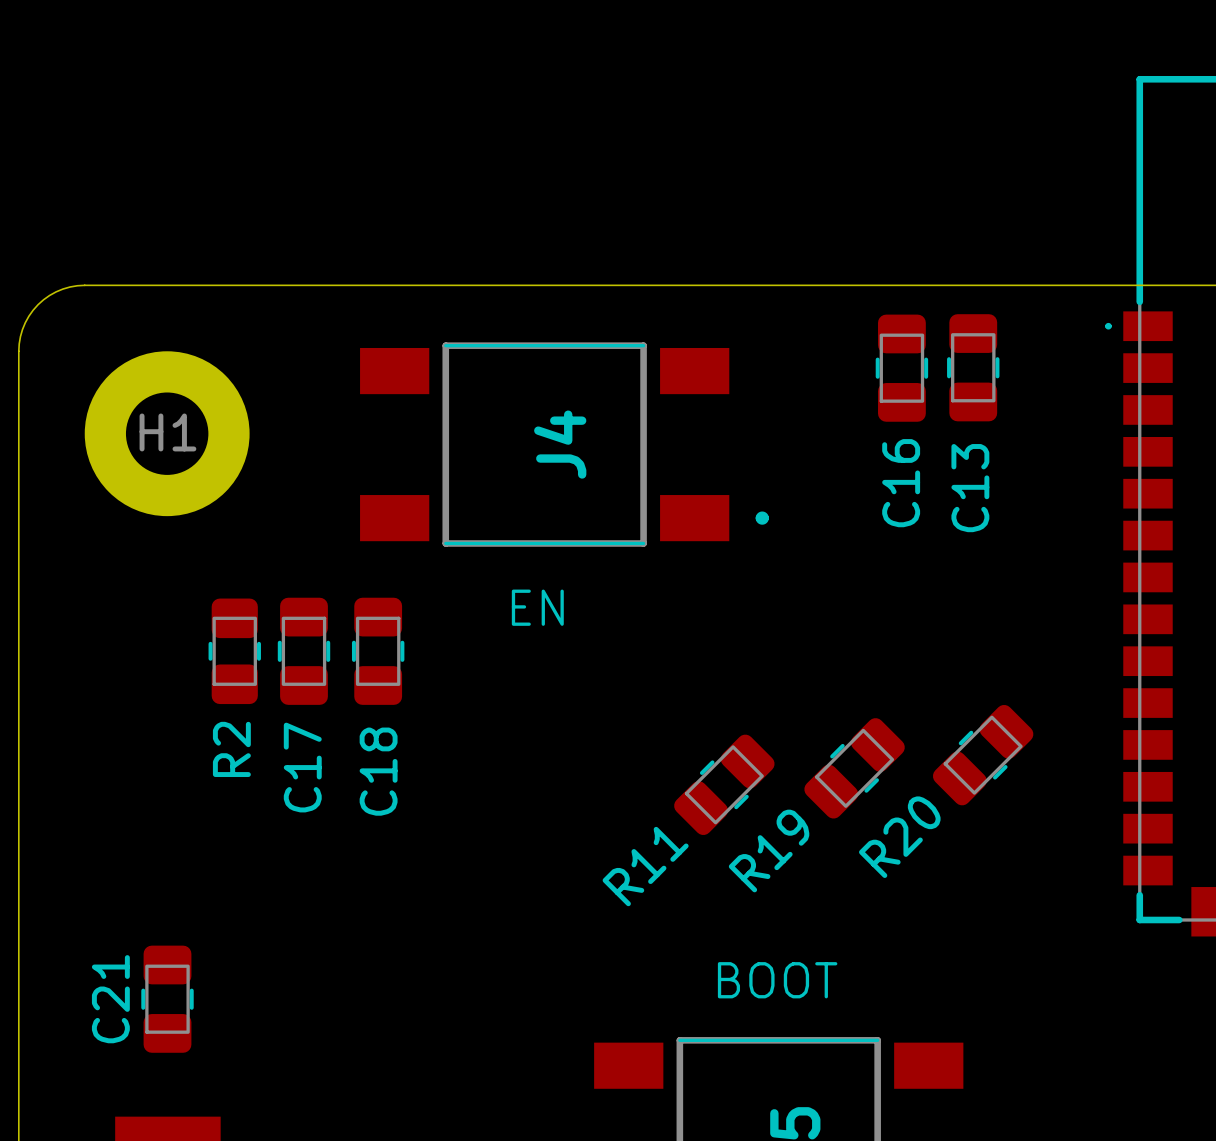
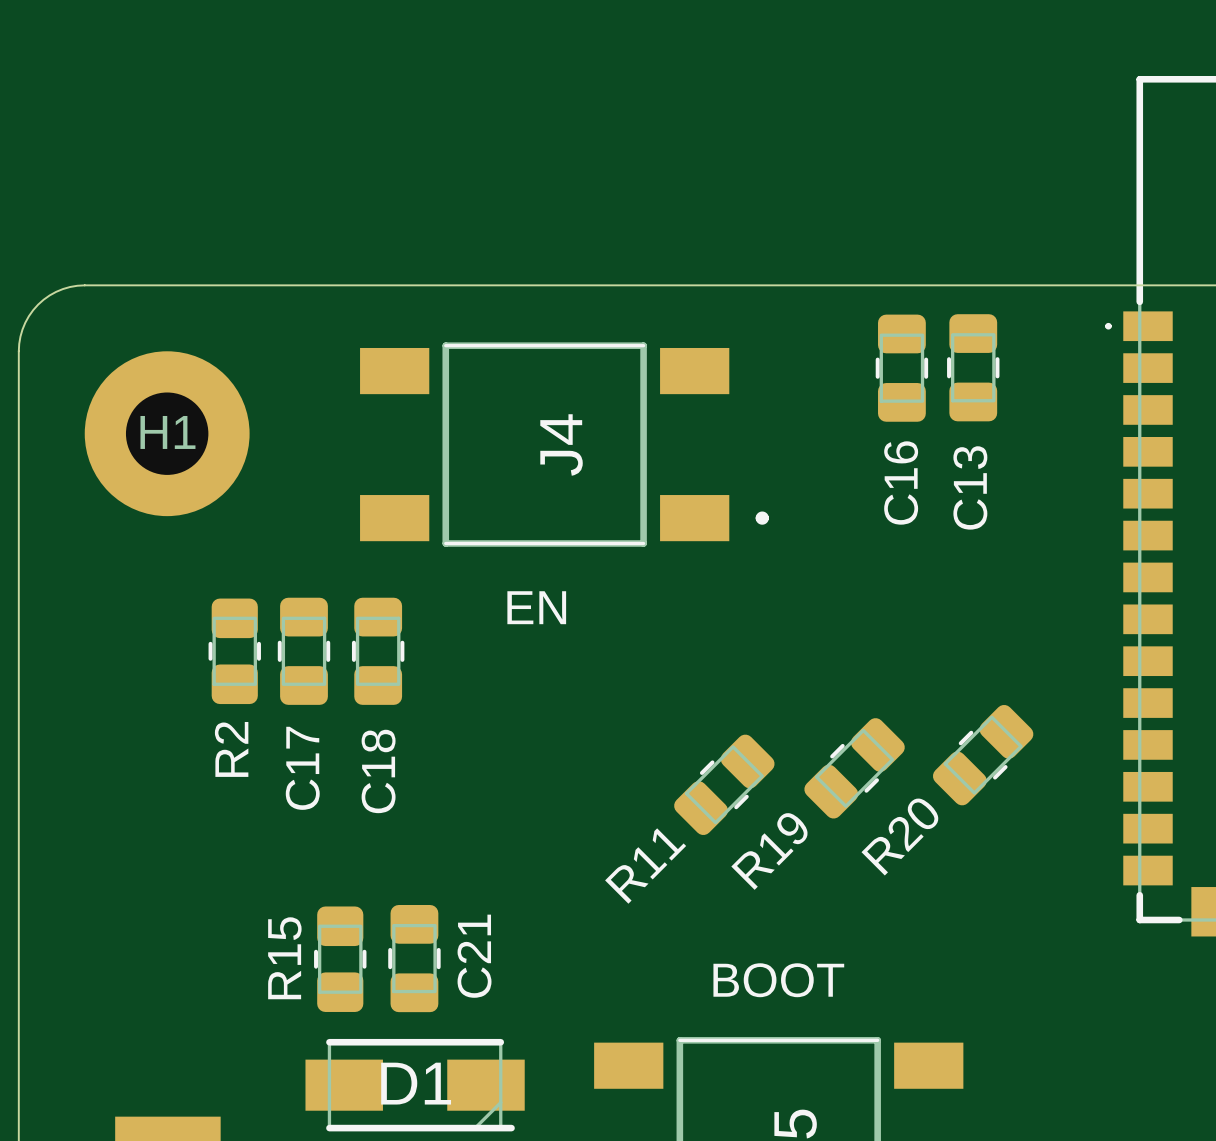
R15: none -> (340, 959)
C21 name position: C21 (110, 999) -> C21 (474, 956)
C21 position: (167, 999) -> (414, 958)
D1: none -> (415, 1085)

